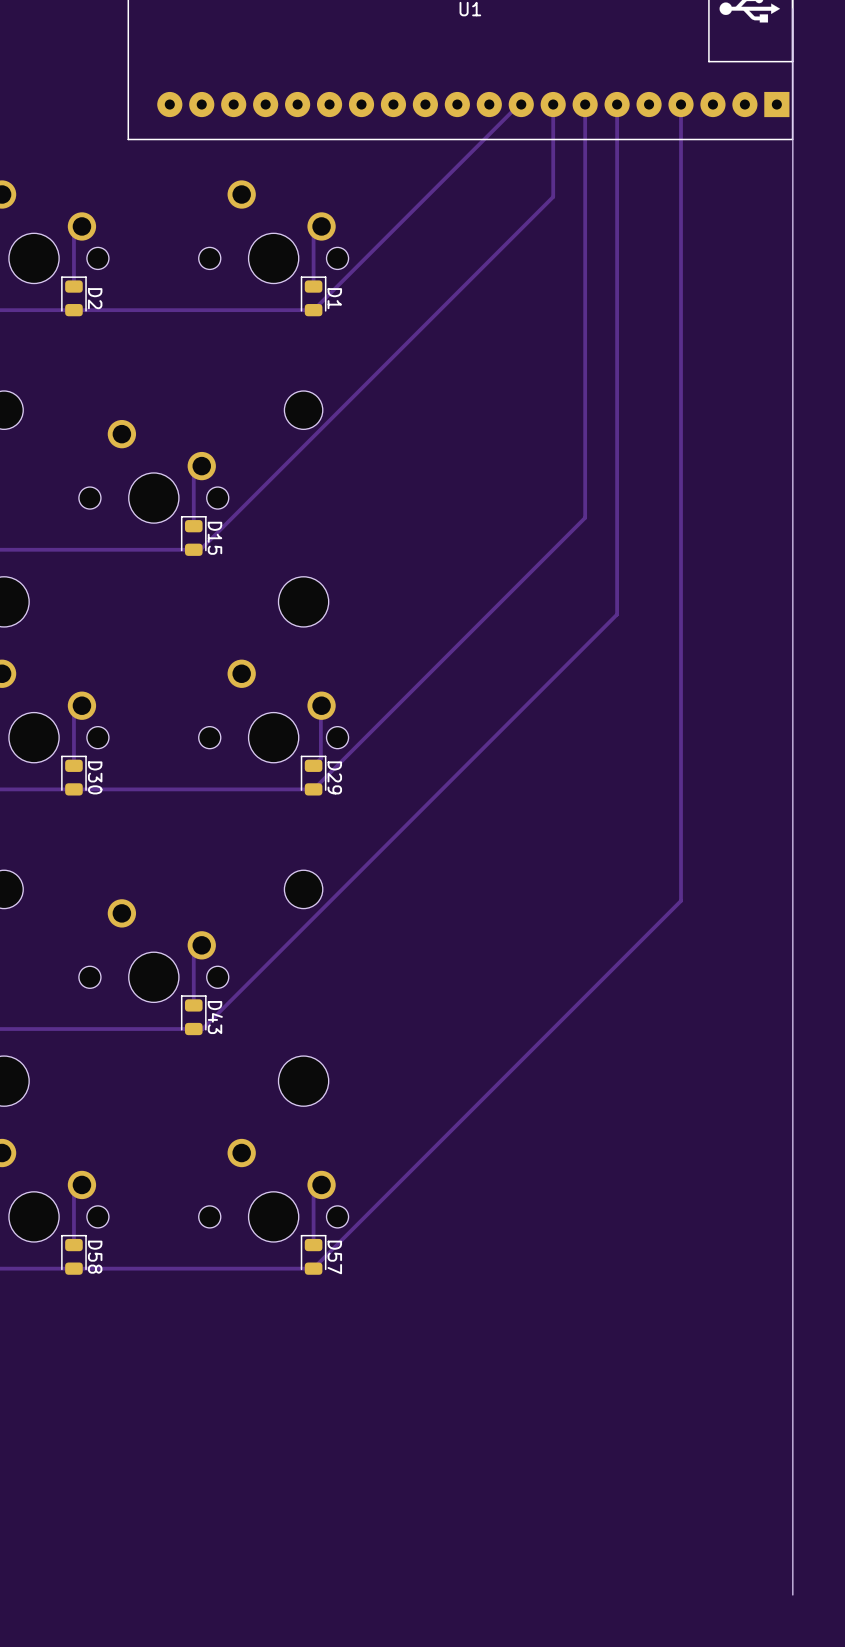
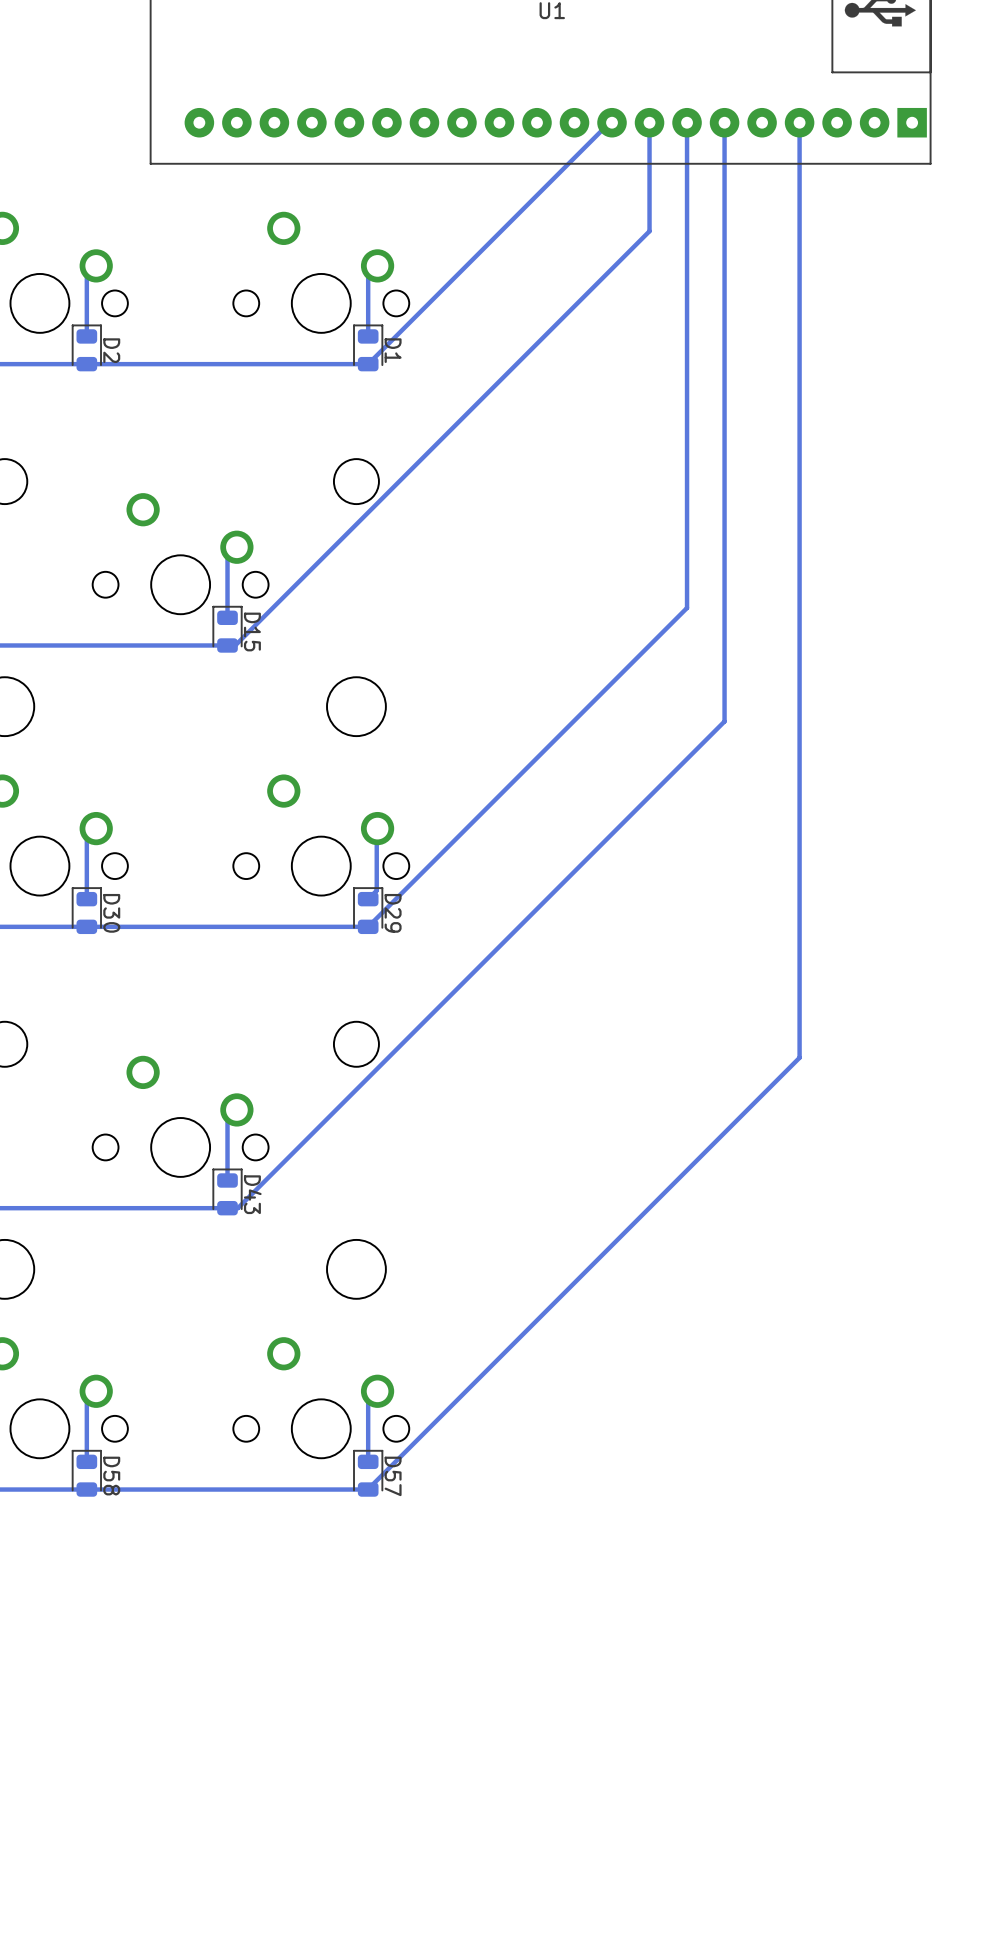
board edge: (792, 8) (792, 1594) -> none

